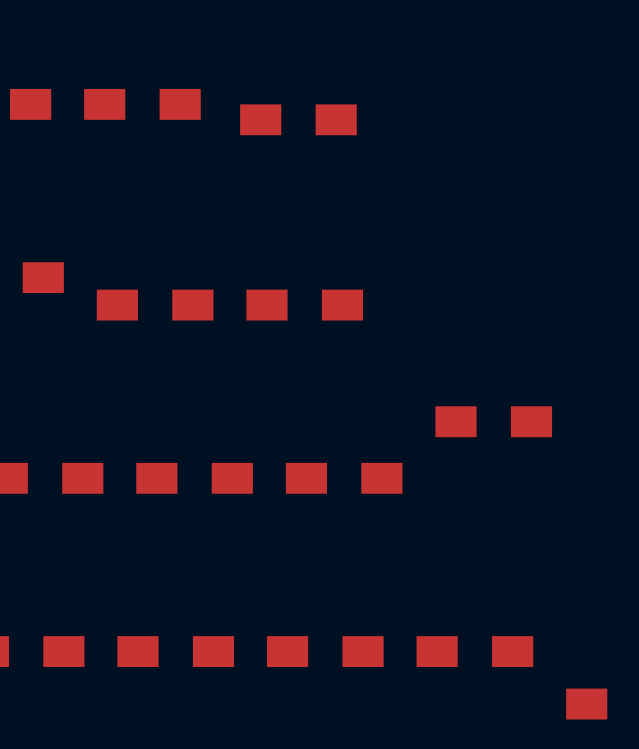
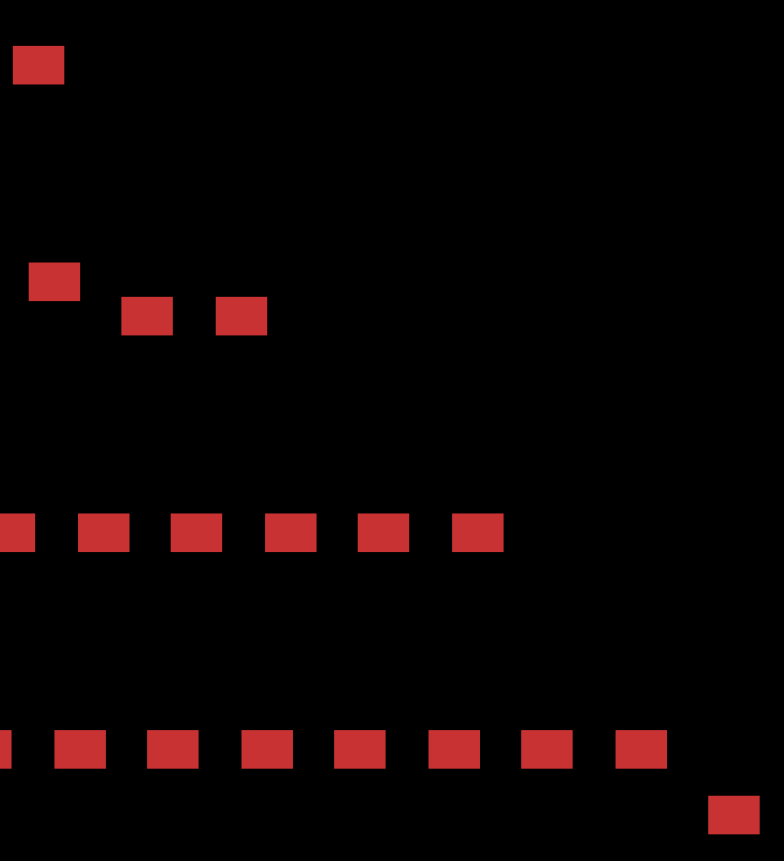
part: (142, 104) -> none
part: (298, 119) -> none
part: (304, 305) -> none
part: (493, 421) -> none

